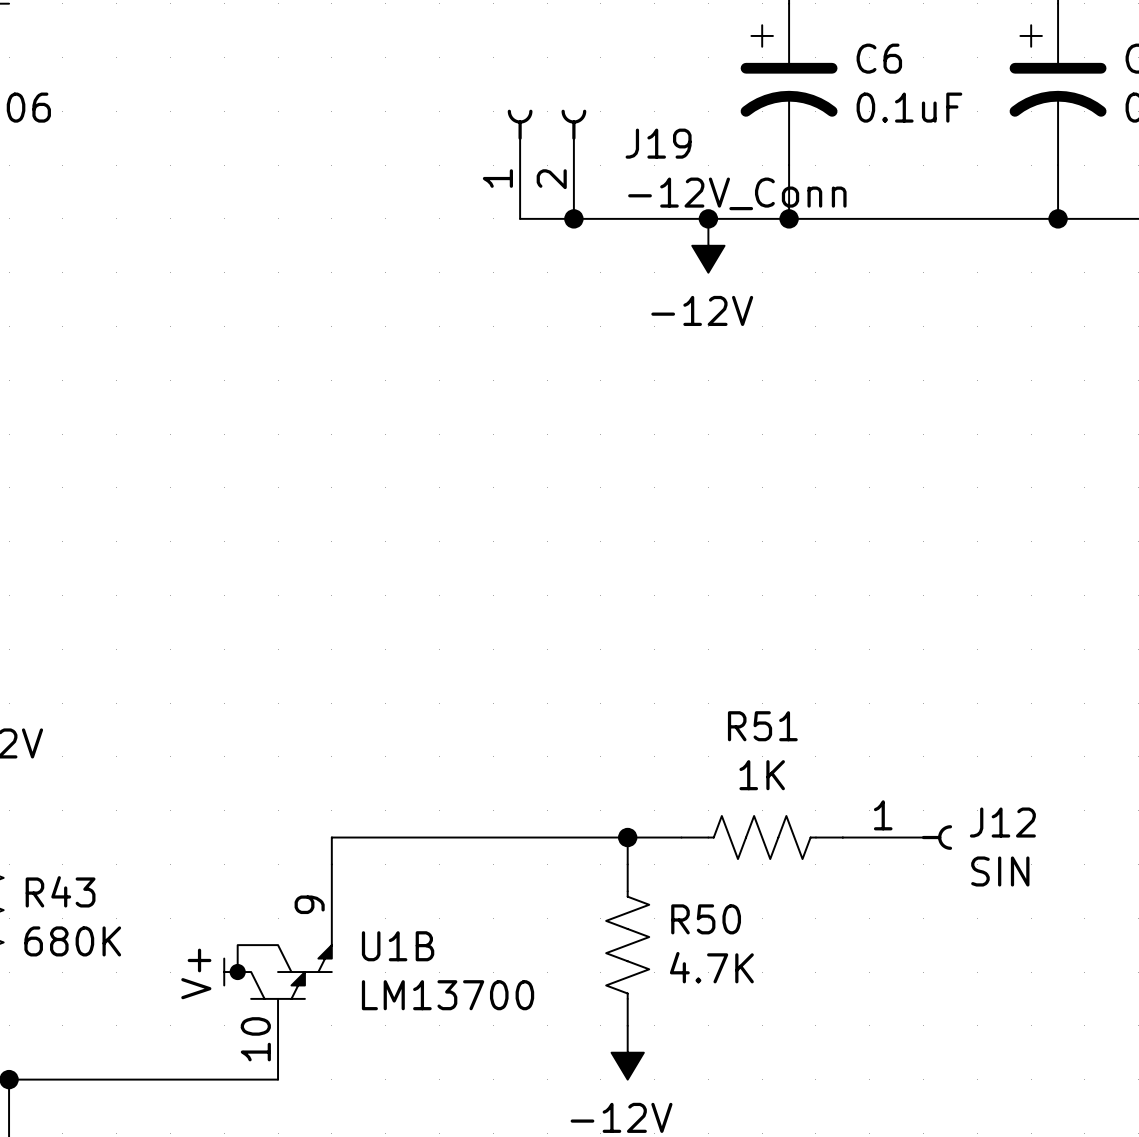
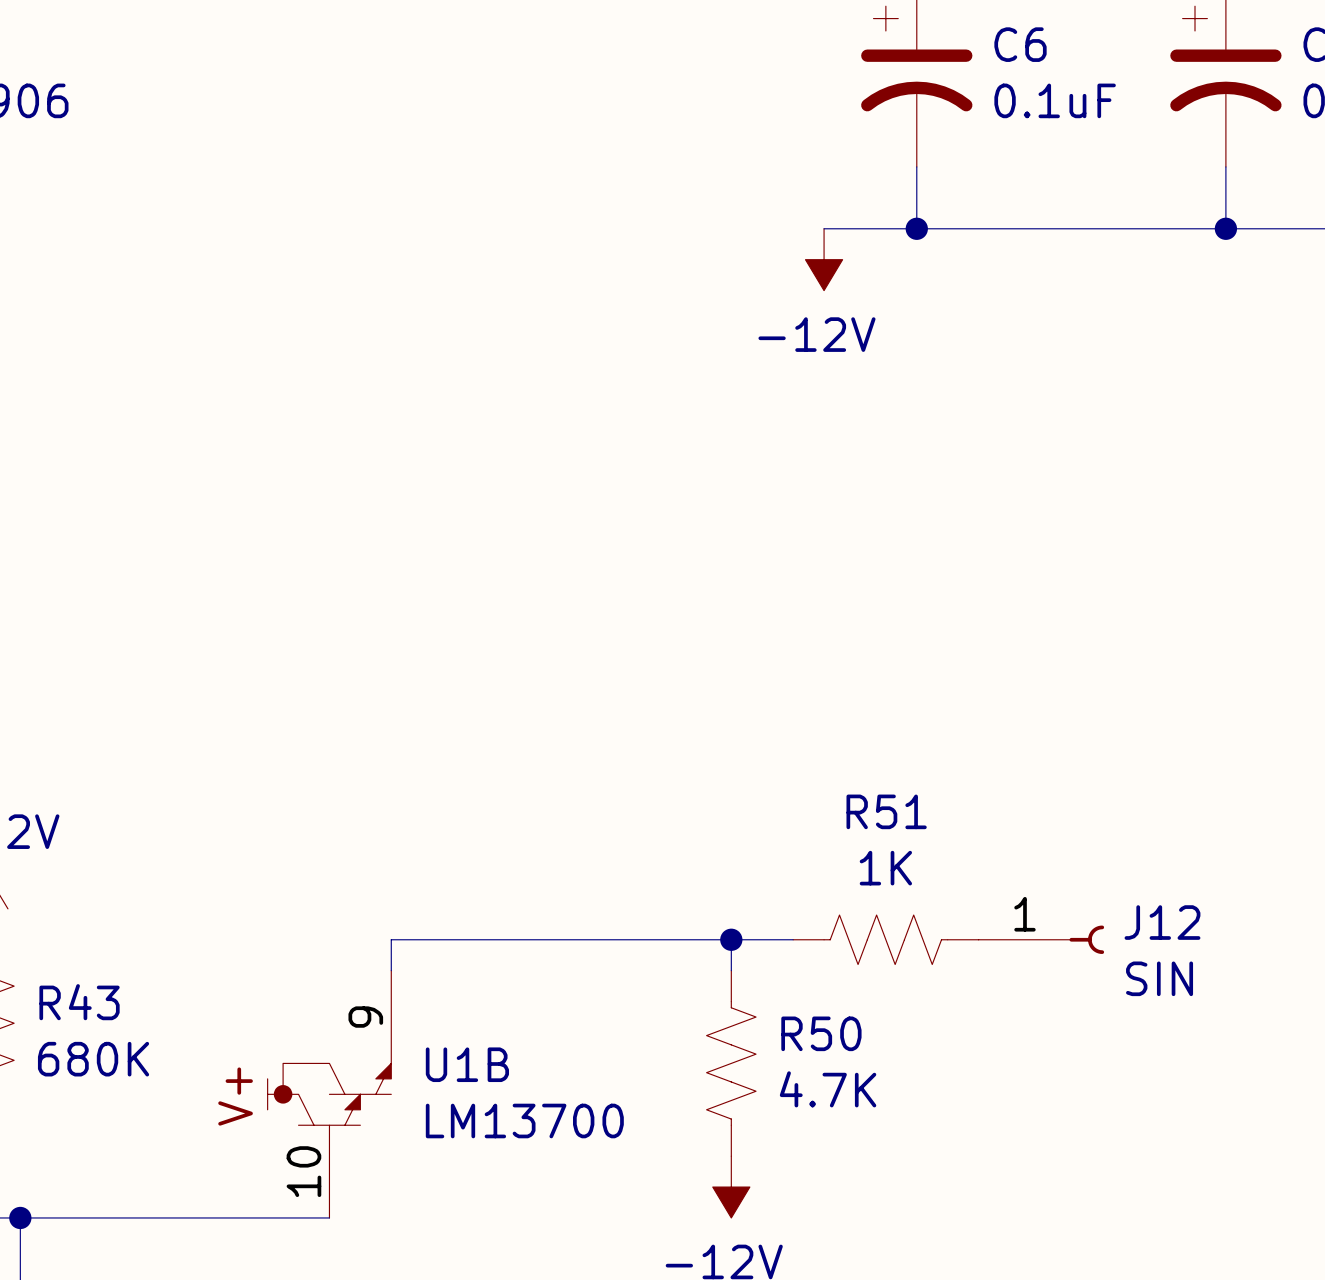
J19: -12V_Conn (547, 164) -> none
wire: (520, 218) (708, 218) -> none
junction: (573, 218) -> none
junction: (708, 218) -> none

